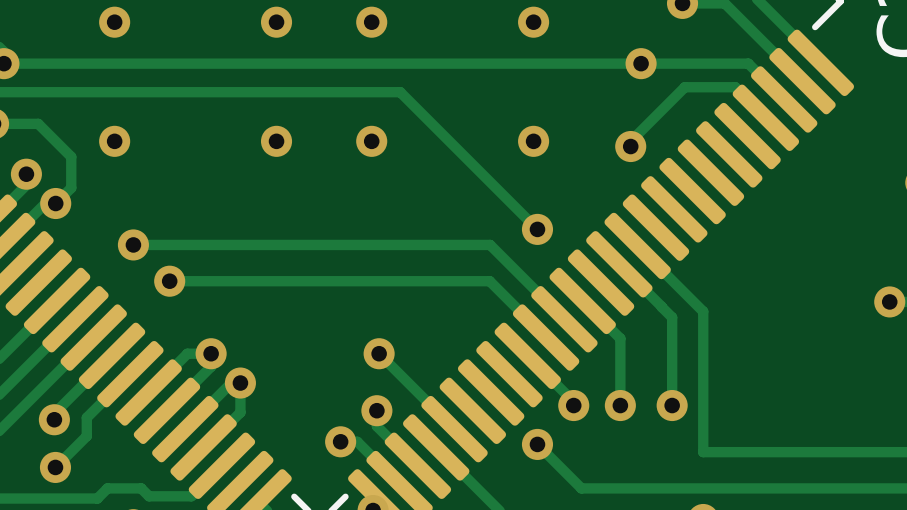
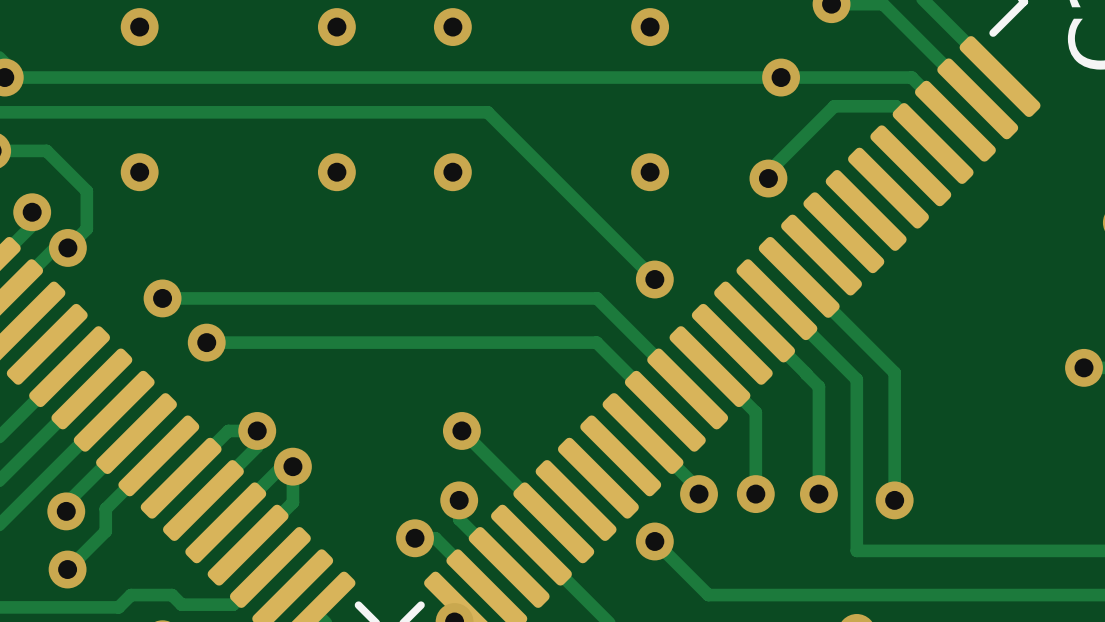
track: none -> (799, 277) (894, 372) (894, 500)
via: none -> (894, 500)

